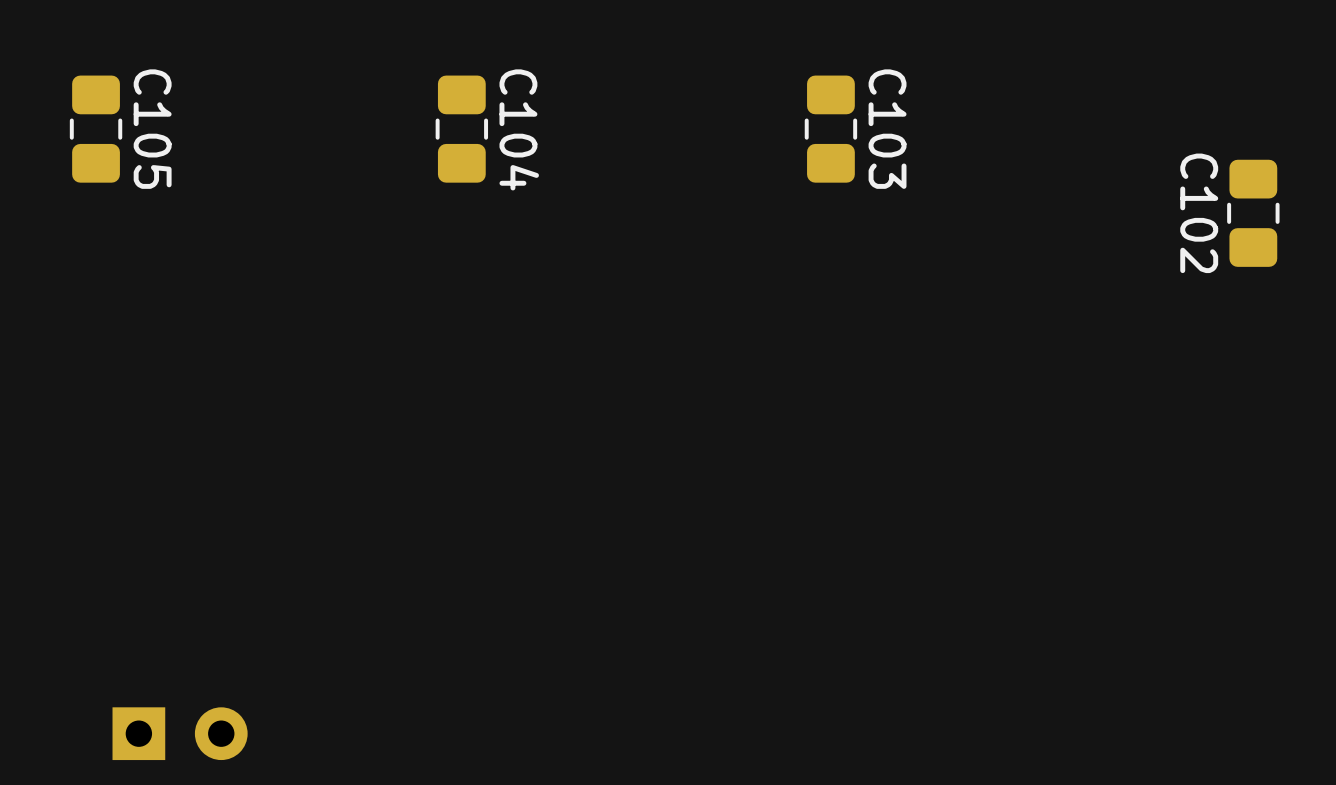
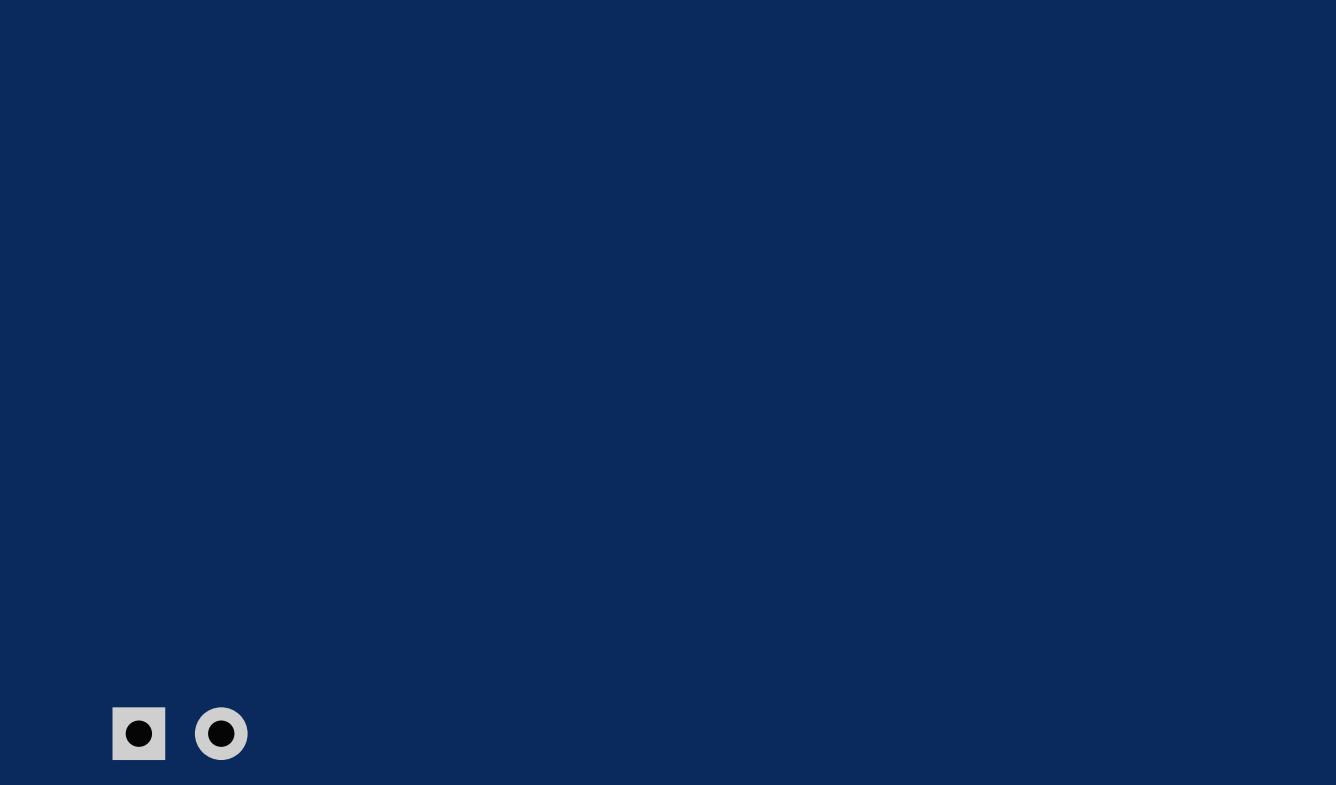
C105: (96, 129) -> none
C104: (461, 129) -> none
C103: (830, 129) -> none
C102: (1253, 213) -> none

